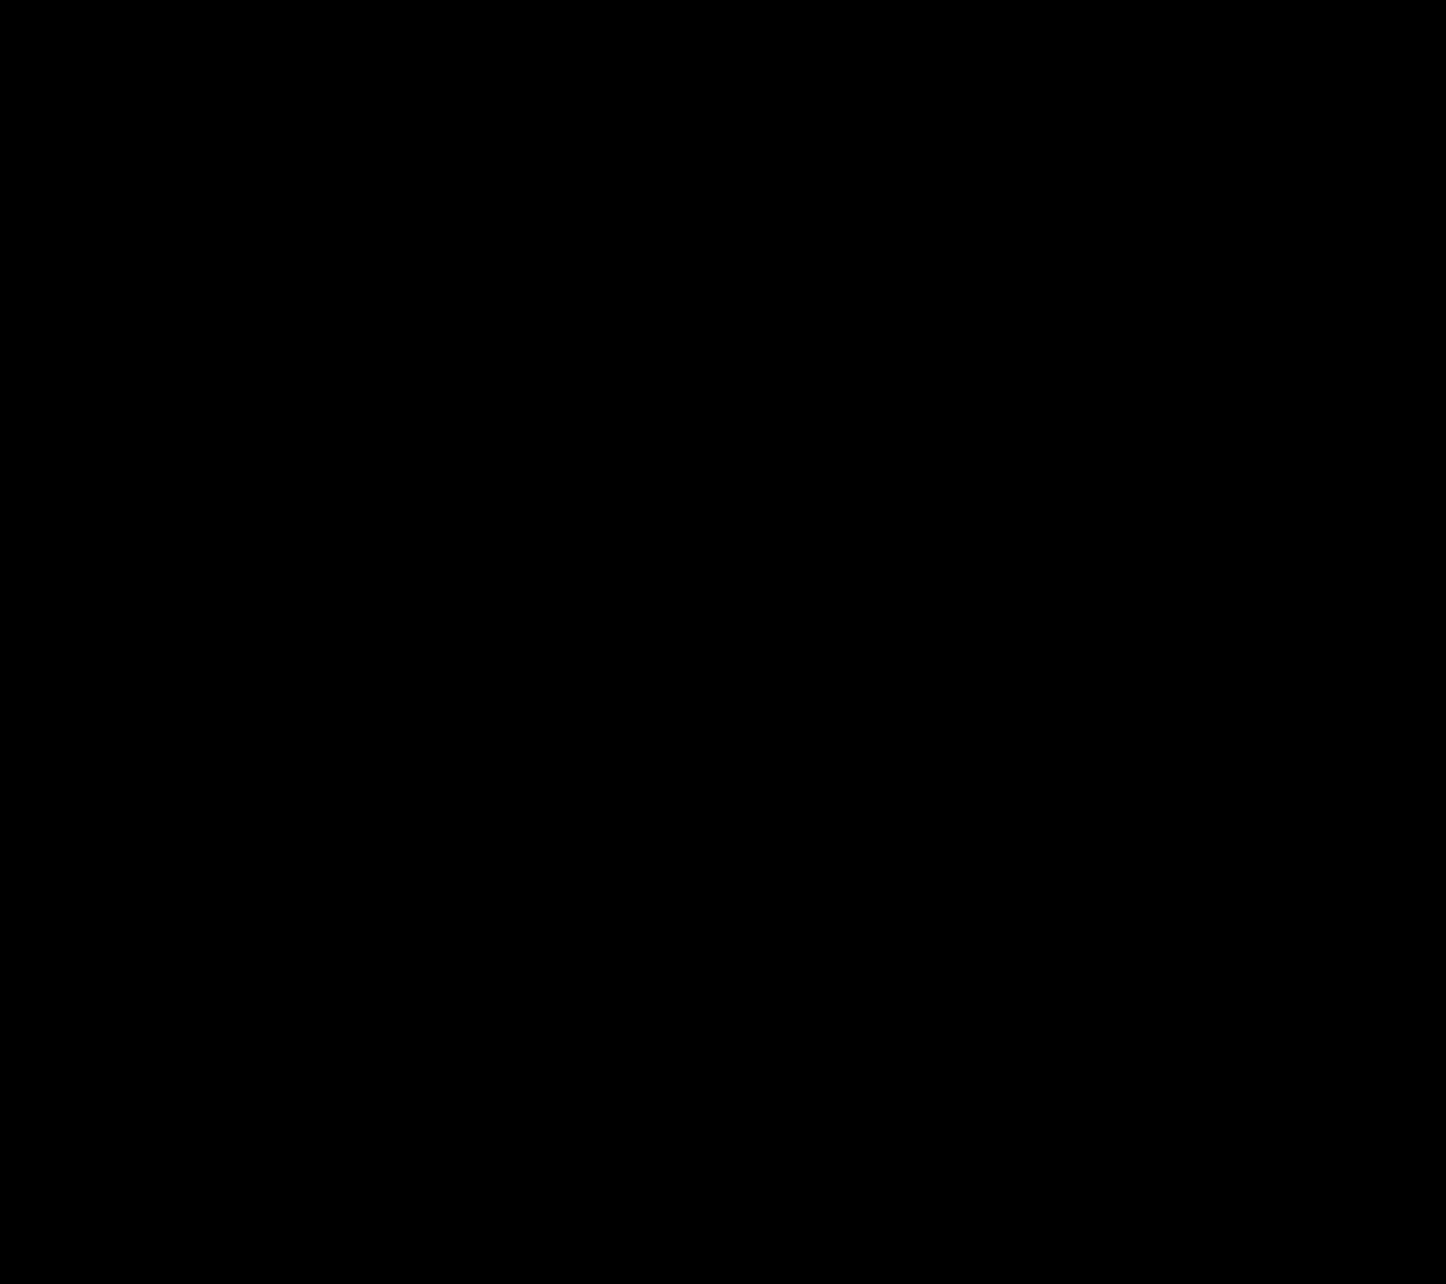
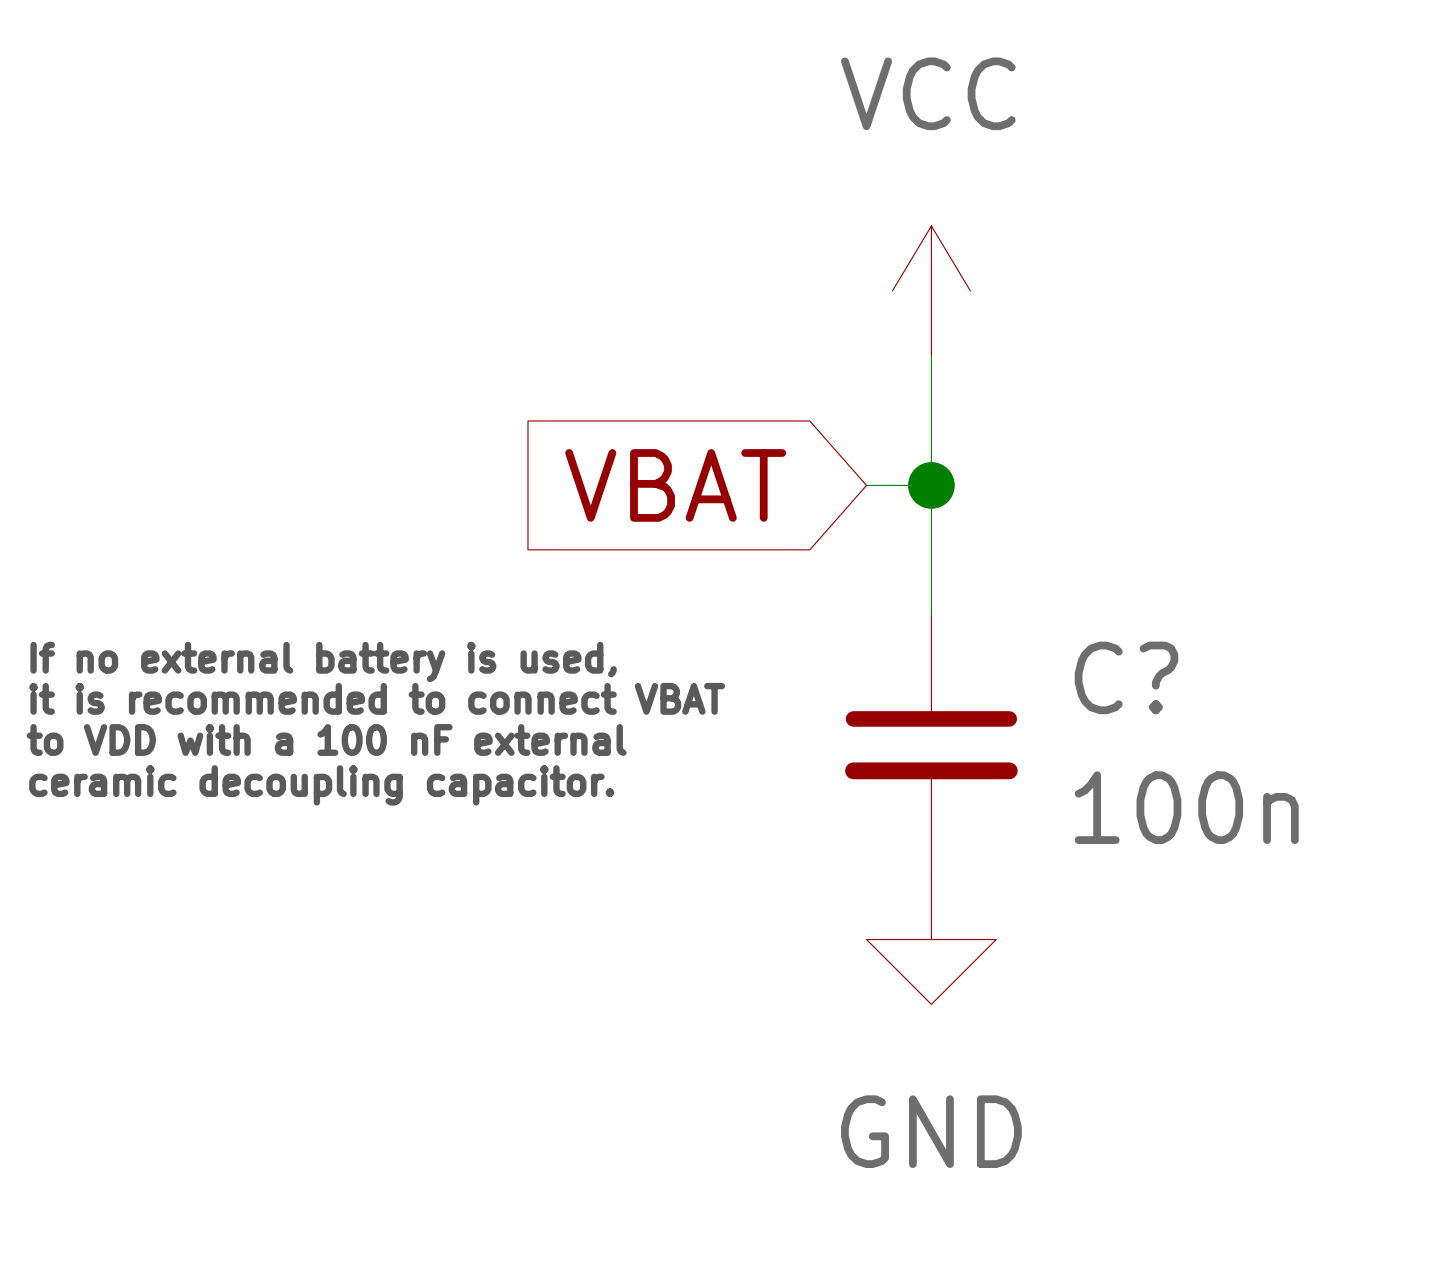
power symbol: none -> VCC (931, 290)
wire: none -> (931, 355) (931, 615)
global label: none -> VBAT (675, 485)
wire: none -> (866, 485) (931, 485)
junction: none -> (931, 485)
text: none -> If no external battery is used, (323, 662)
text: none -> it is recommended to connect VBAT (377, 698)
text: none -> to VDD with a 100 nF external (326, 739)
C?: none -> 100n (931, 744)
text: none -> ceramic decoupling capacitor. (321, 785)
power symbol: none -> GND (931, 939)

